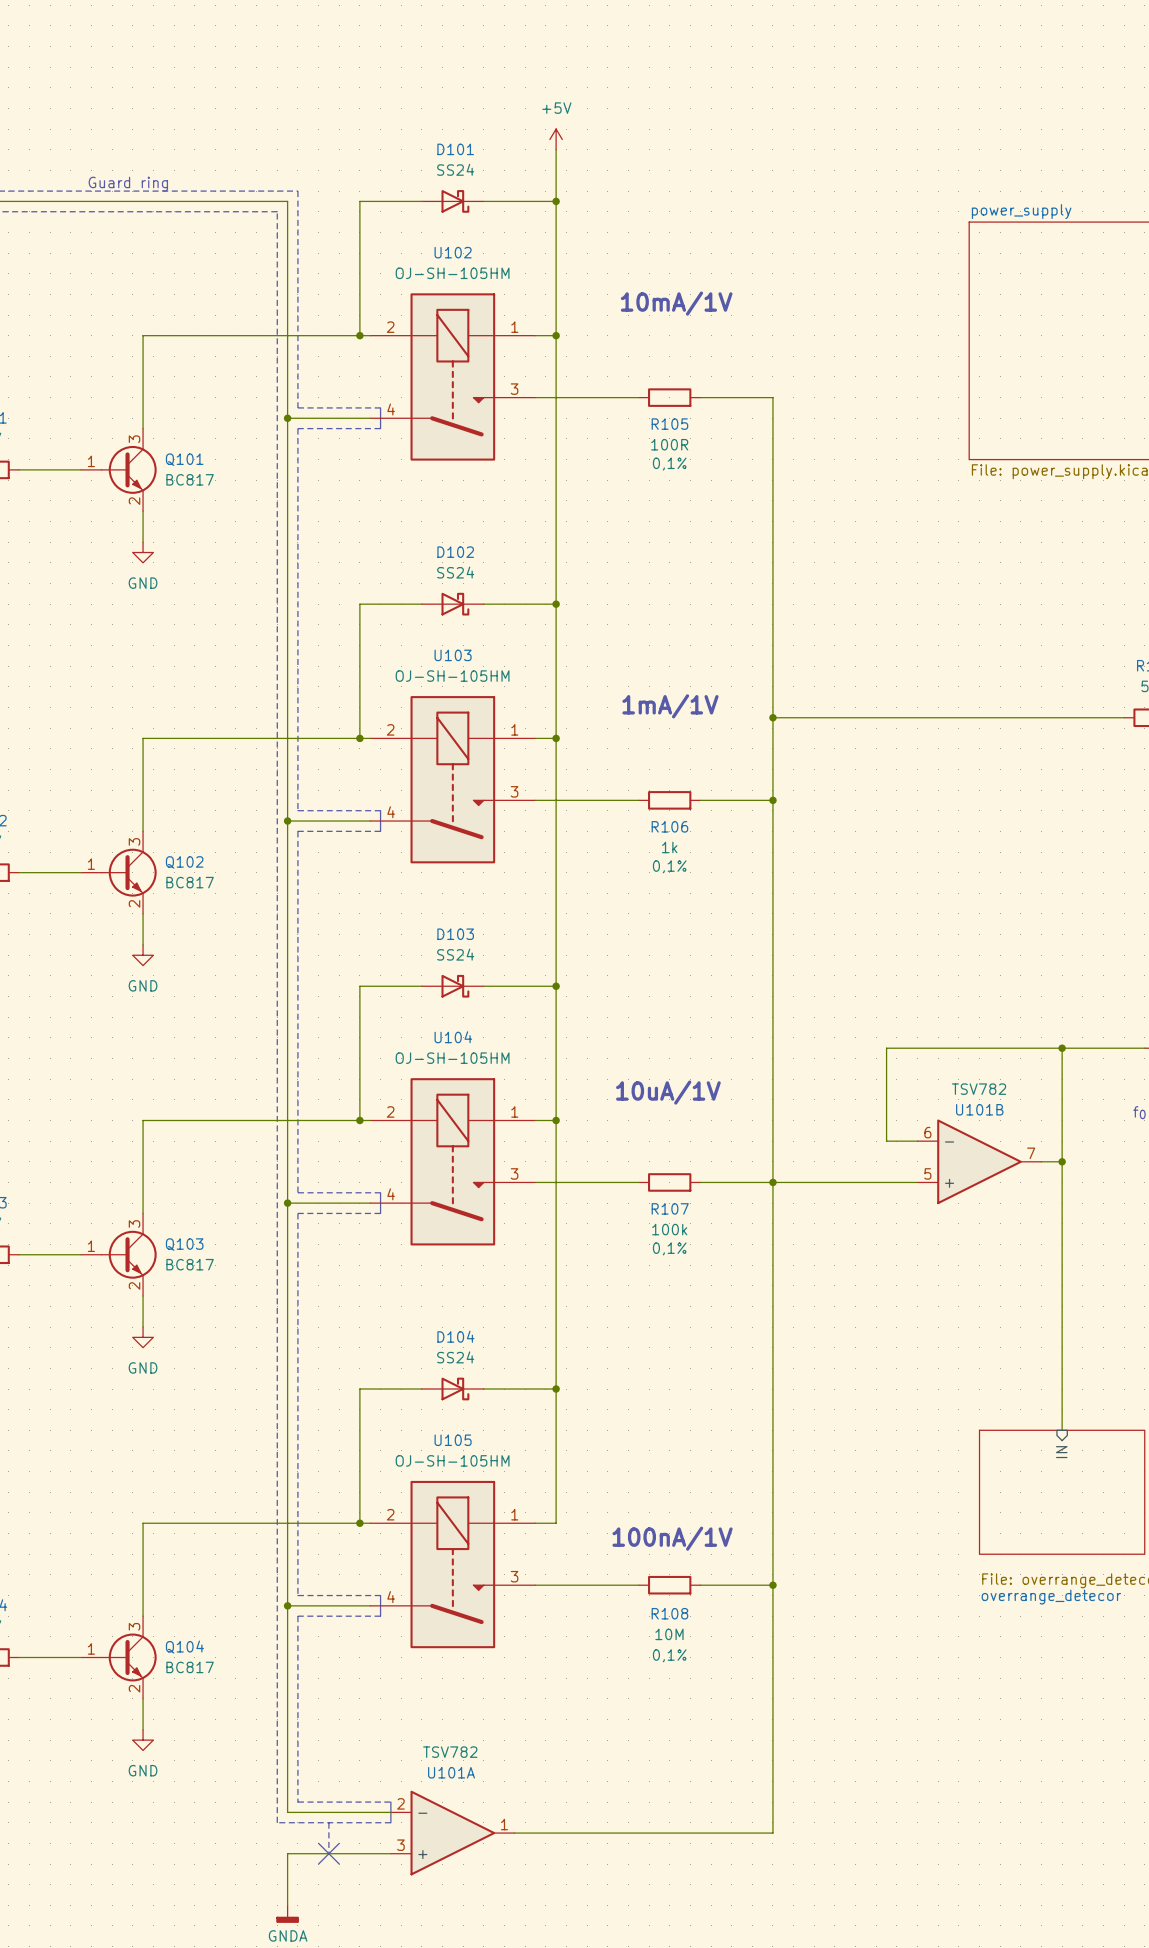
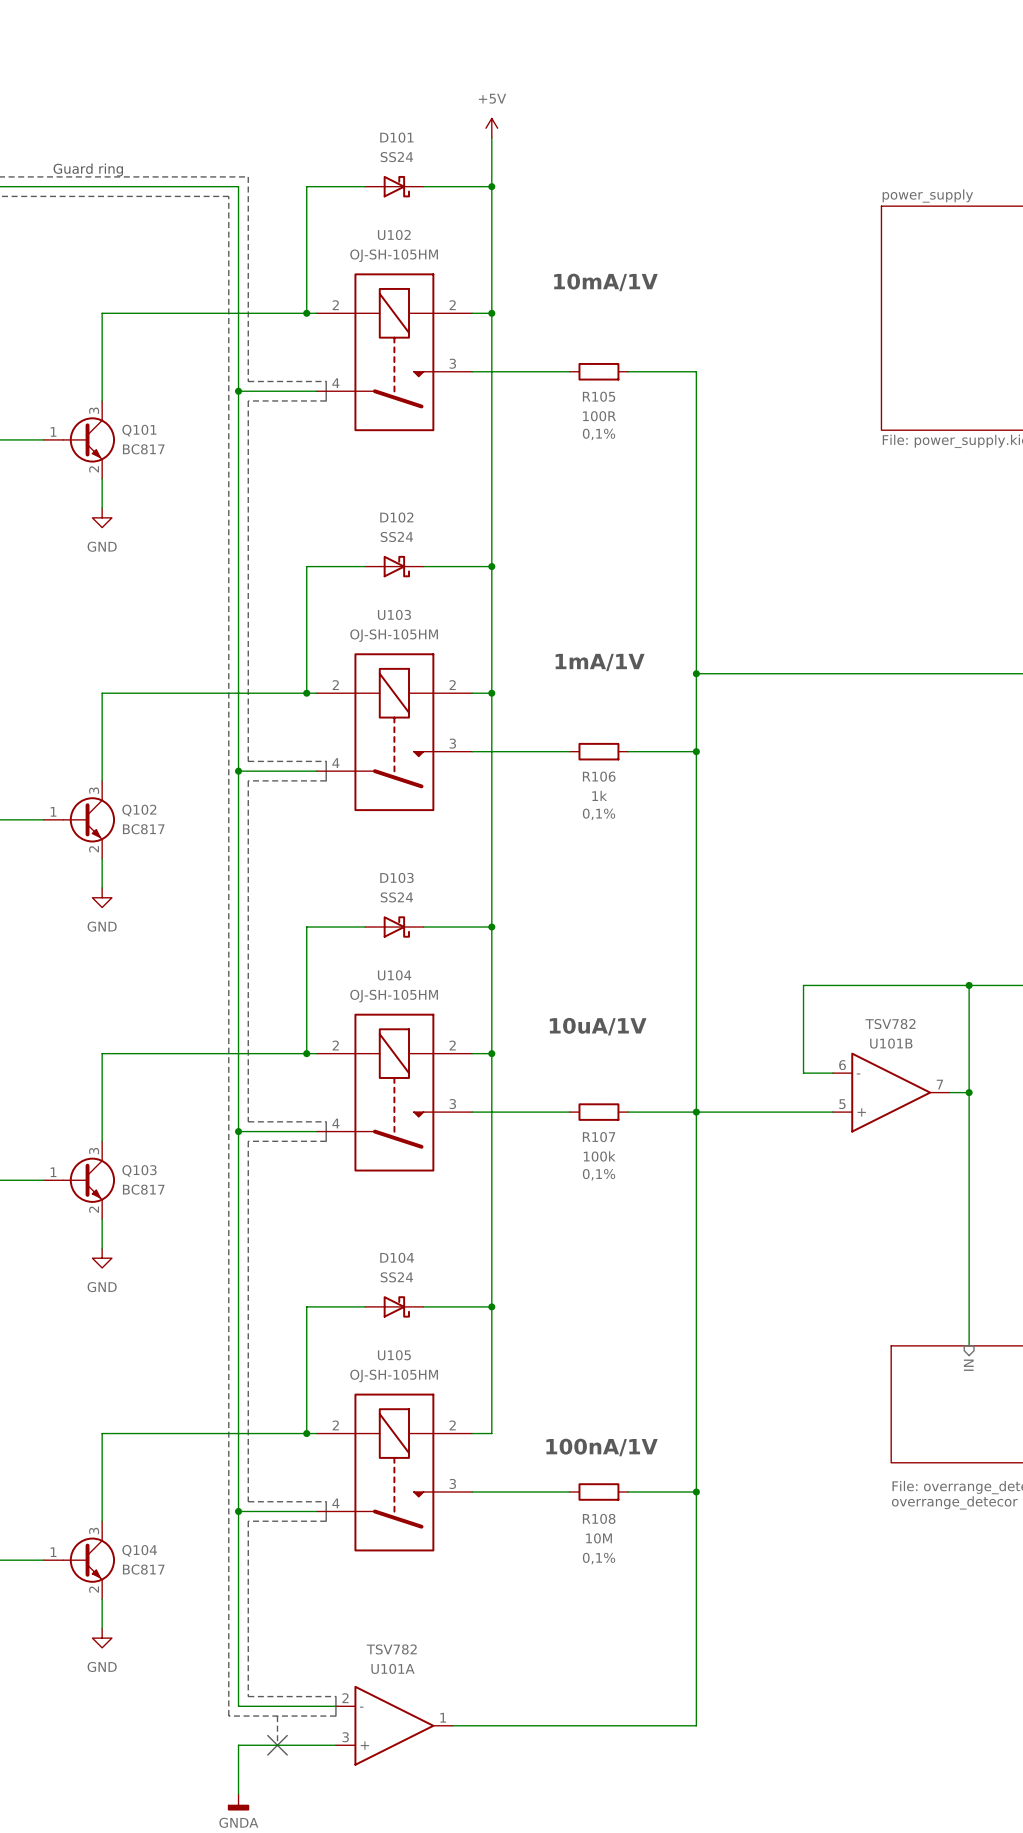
U102 pin number: 1 (514, 327) -> 2 (452, 305)
U103 pin number: 1 (514, 729) -> 2 (452, 685)
U104 pin number: 1 (514, 1111) -> 2 (452, 1045)
U105 pin number: 1 (514, 1514) -> 2 (452, 1425)

